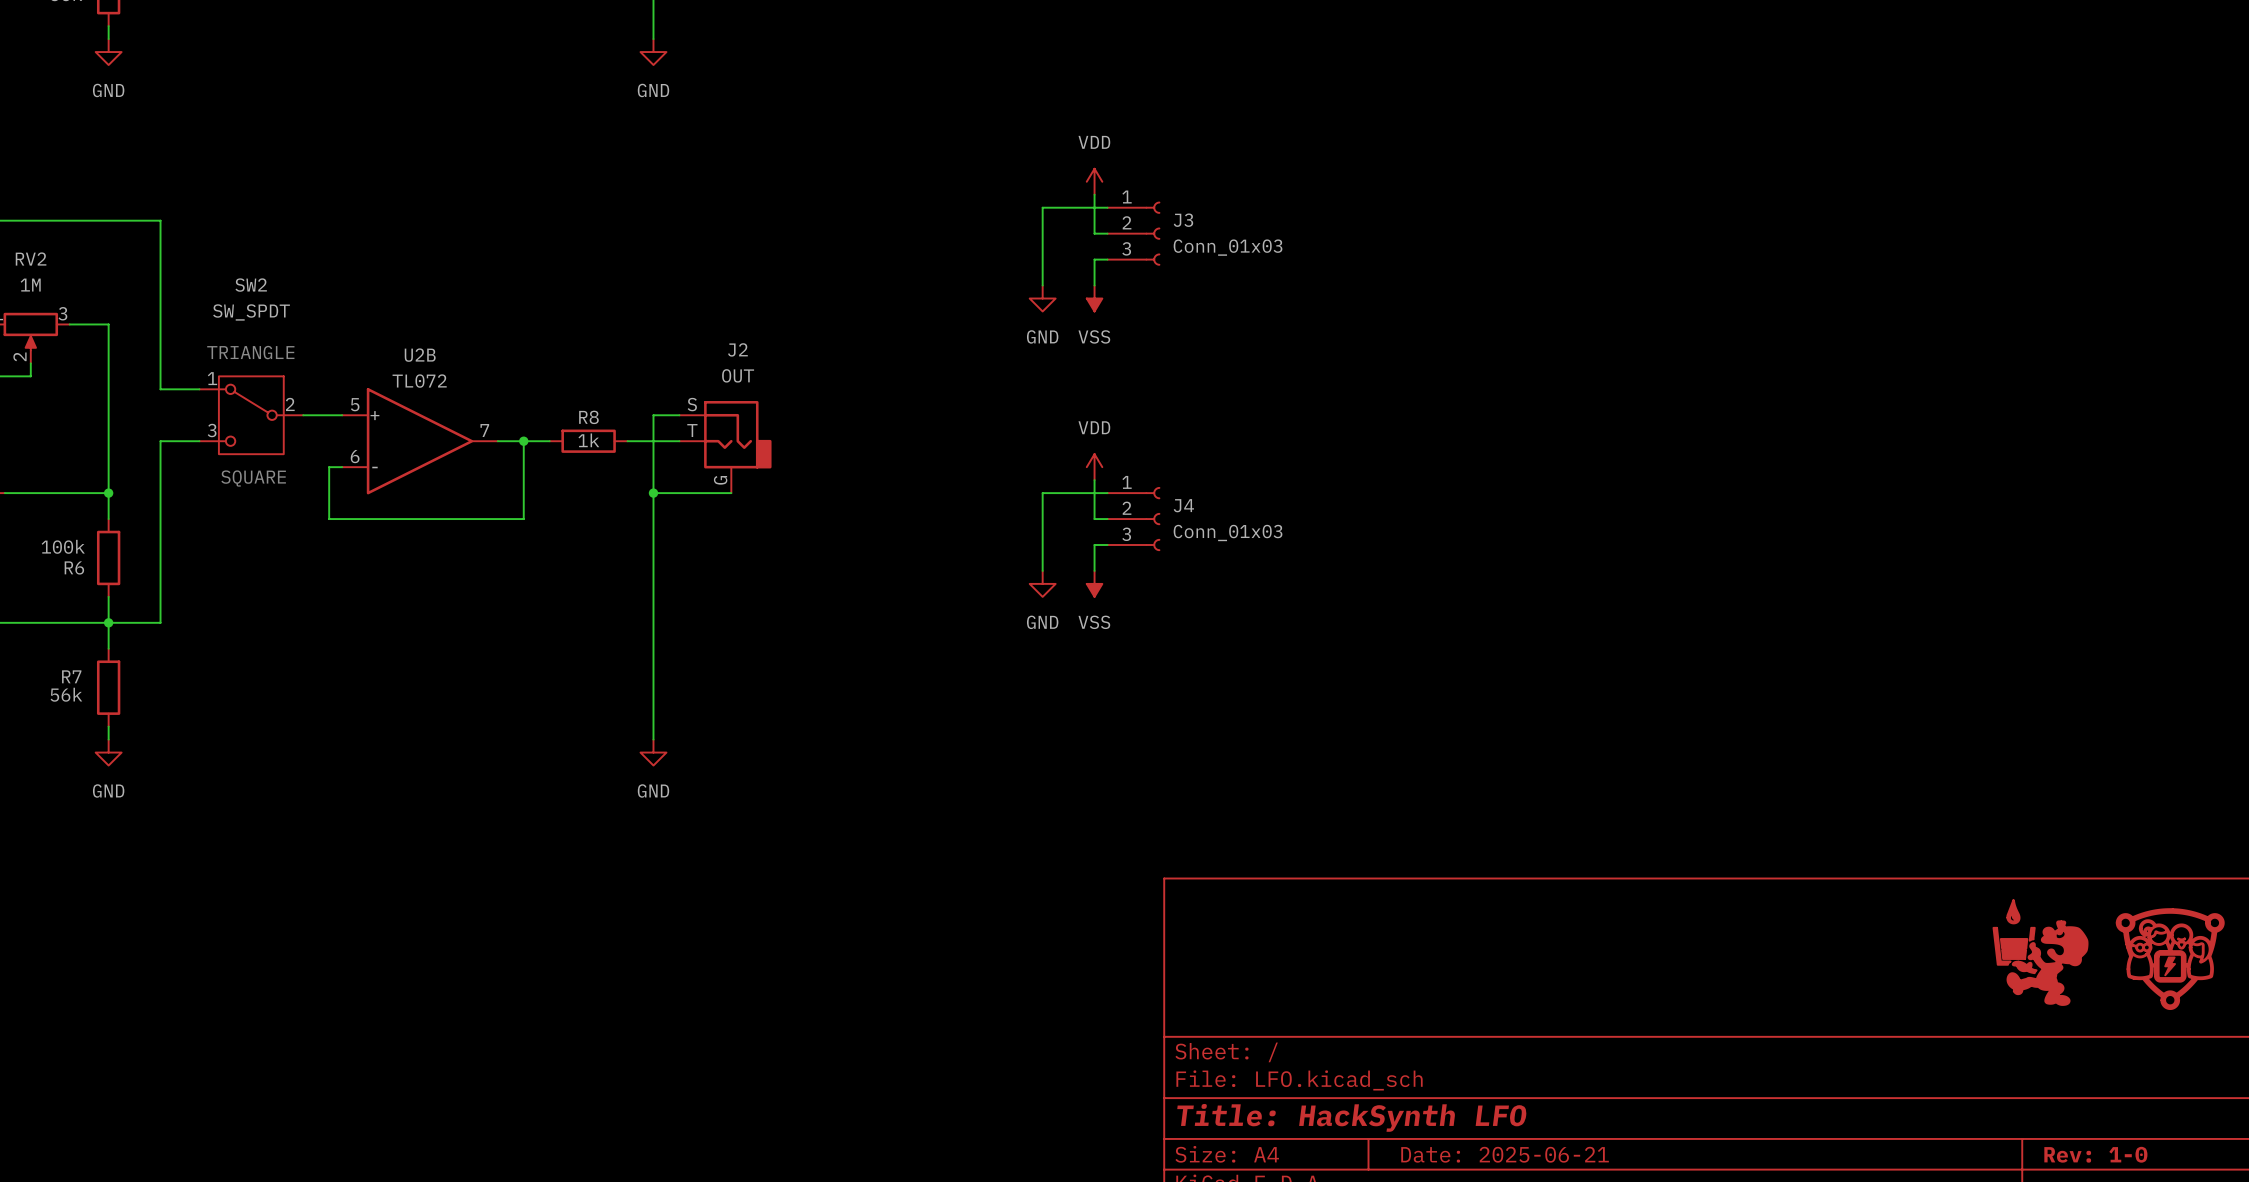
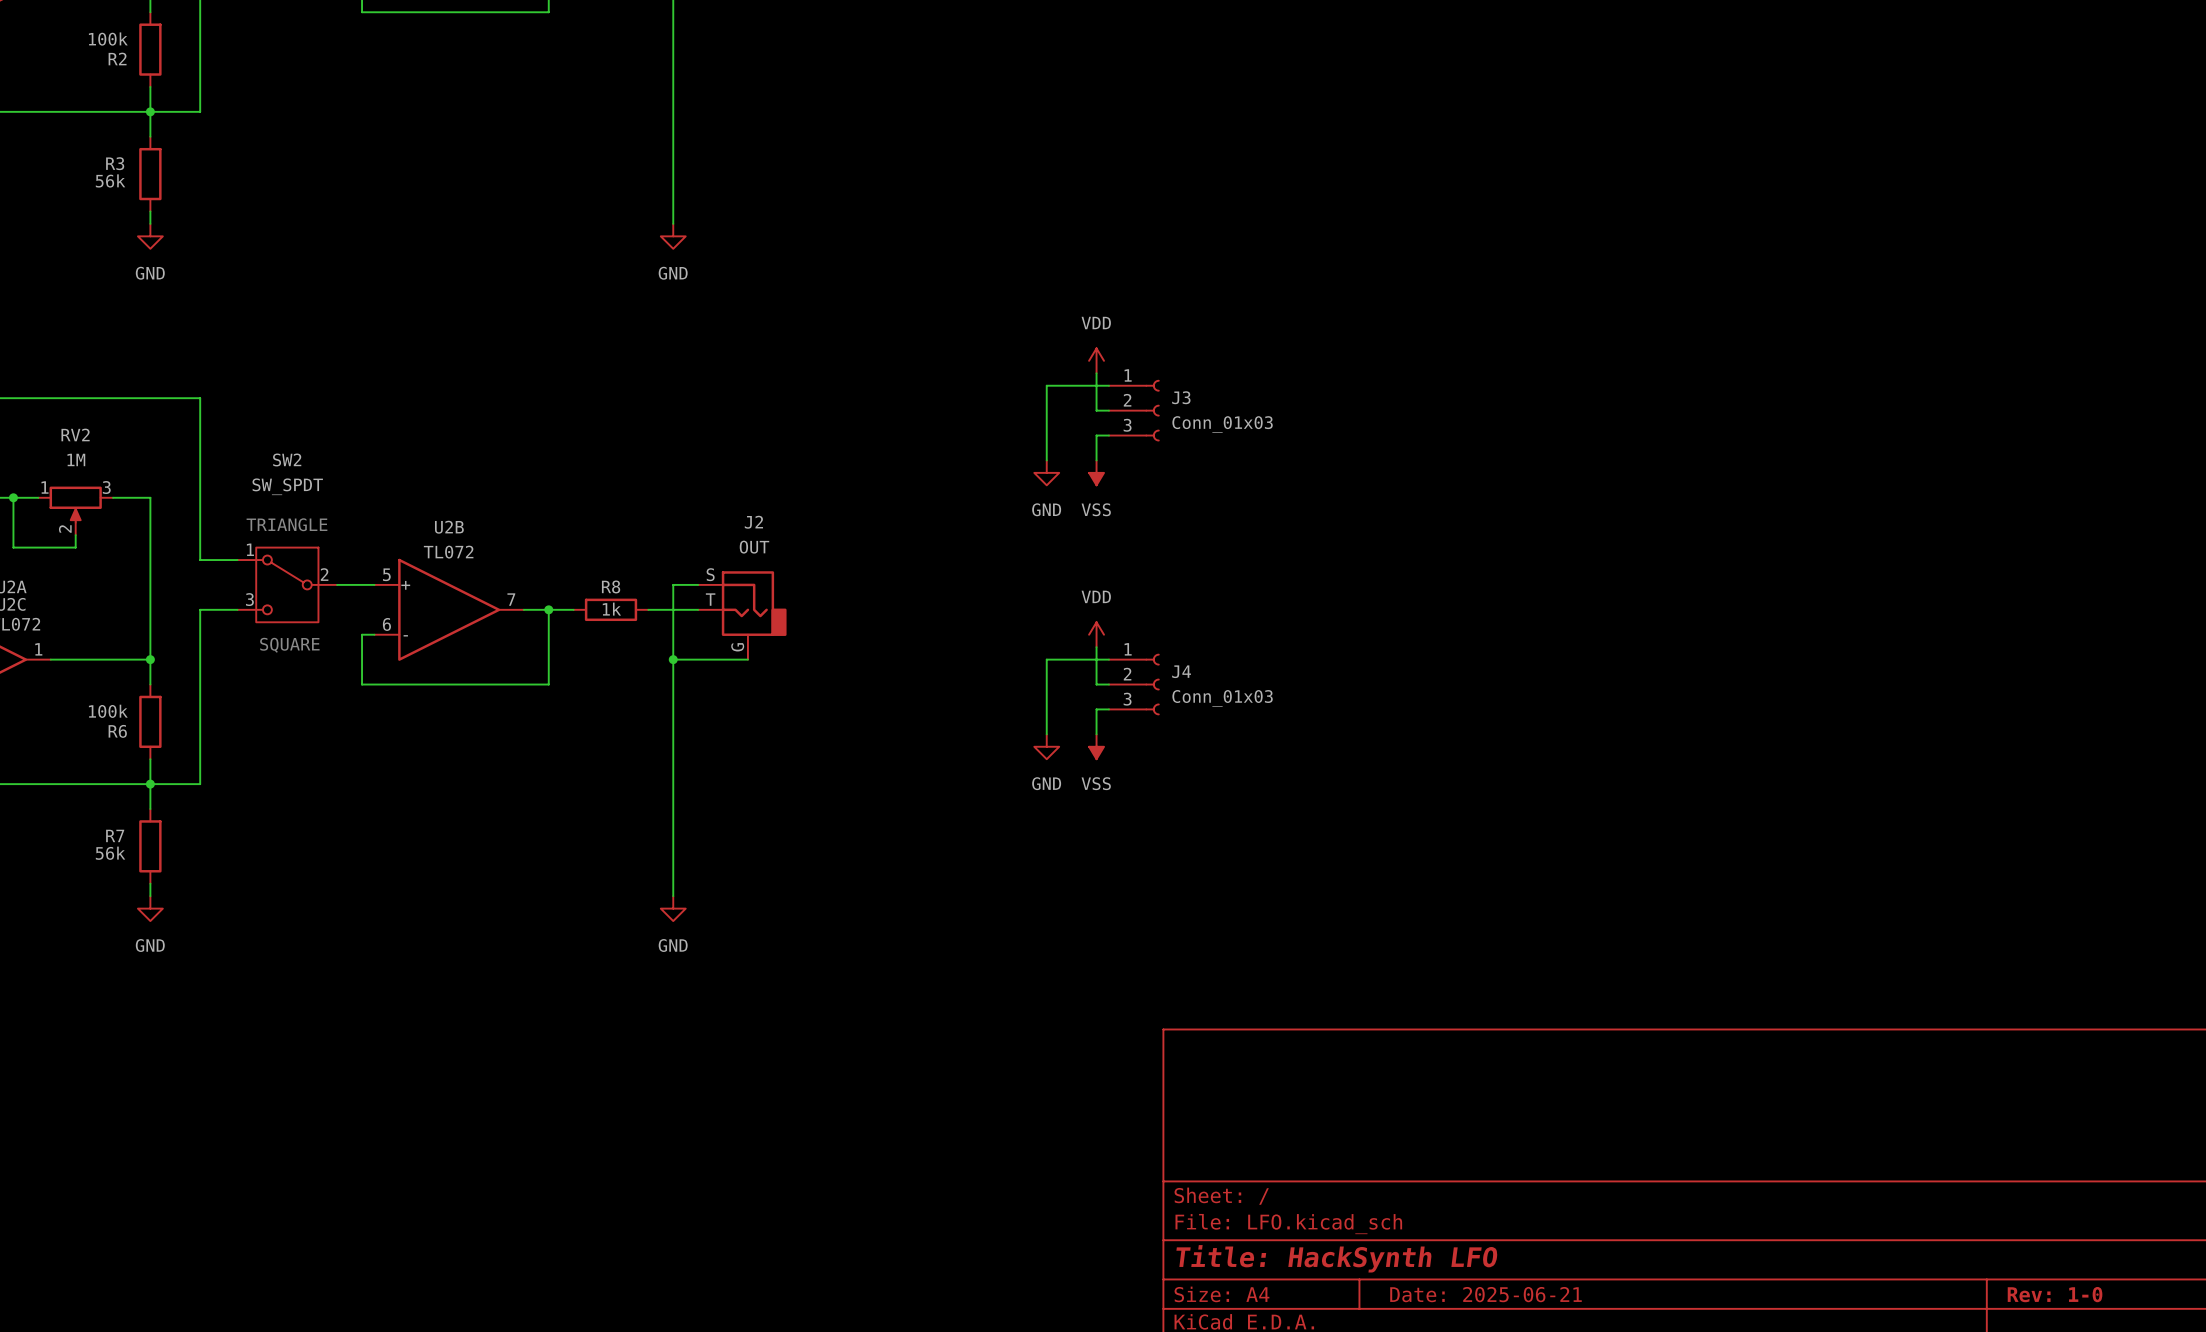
part: (2040, 952) -> none
part: (2170, 959) -> none

